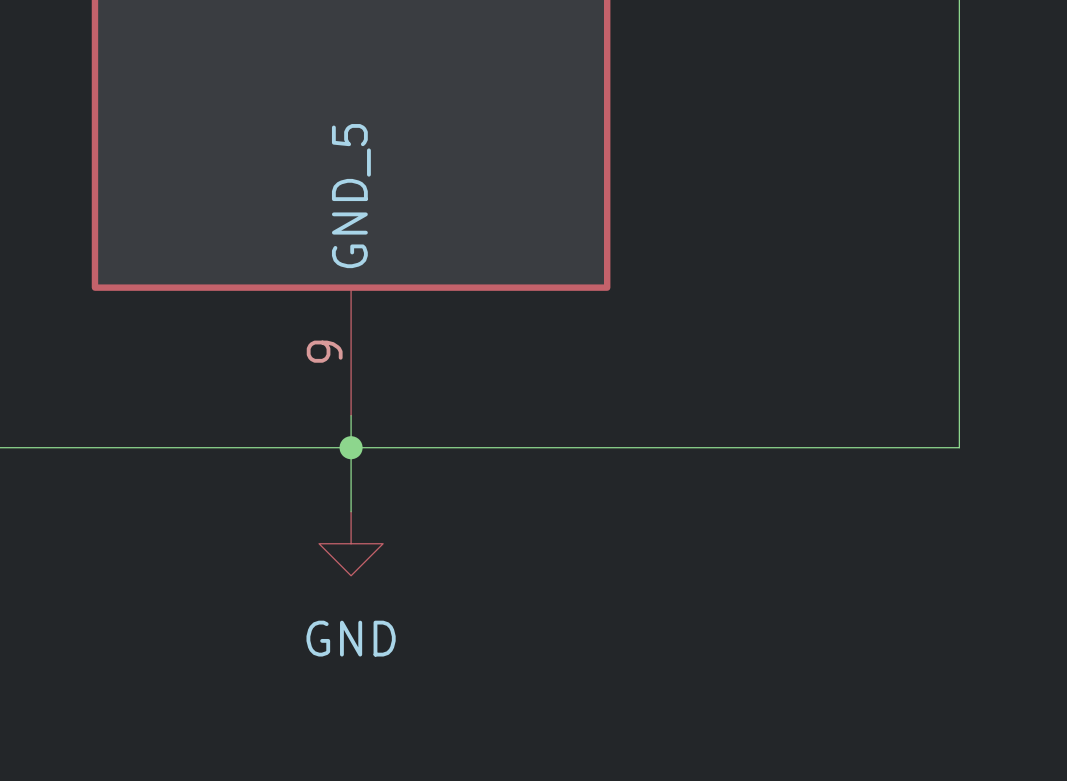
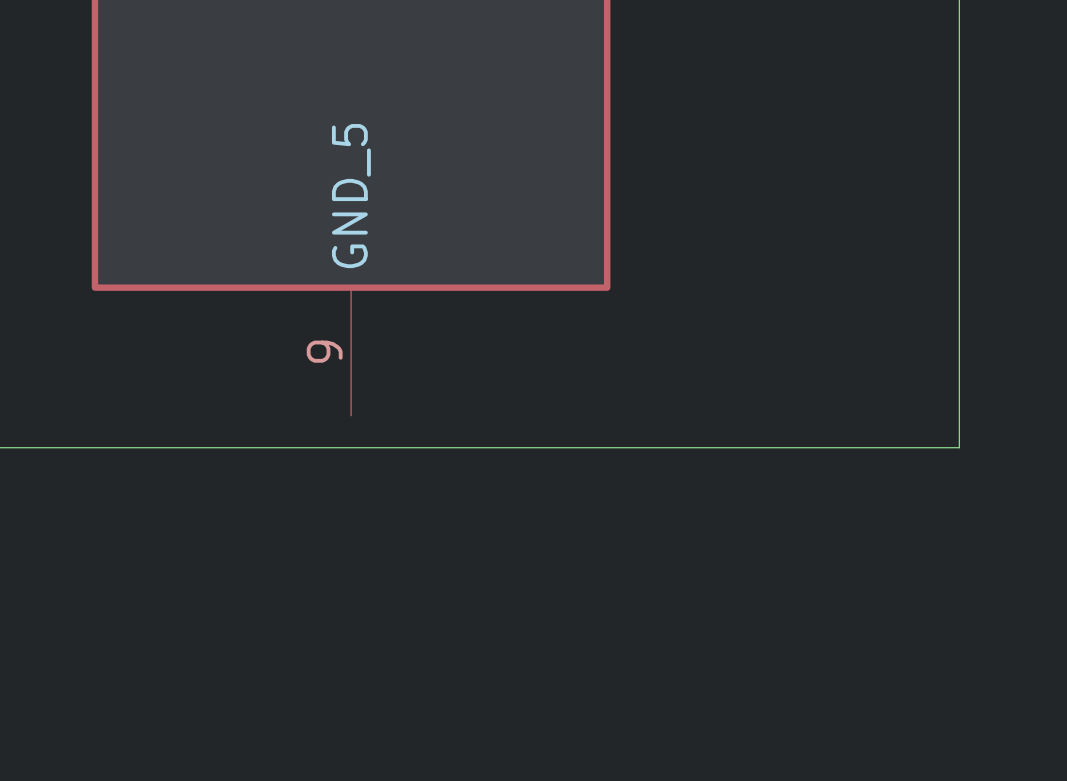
wire: (351, 415) (351, 511) -> none
junction: (351, 447) -> none
power symbol: GND (351, 543) -> none

